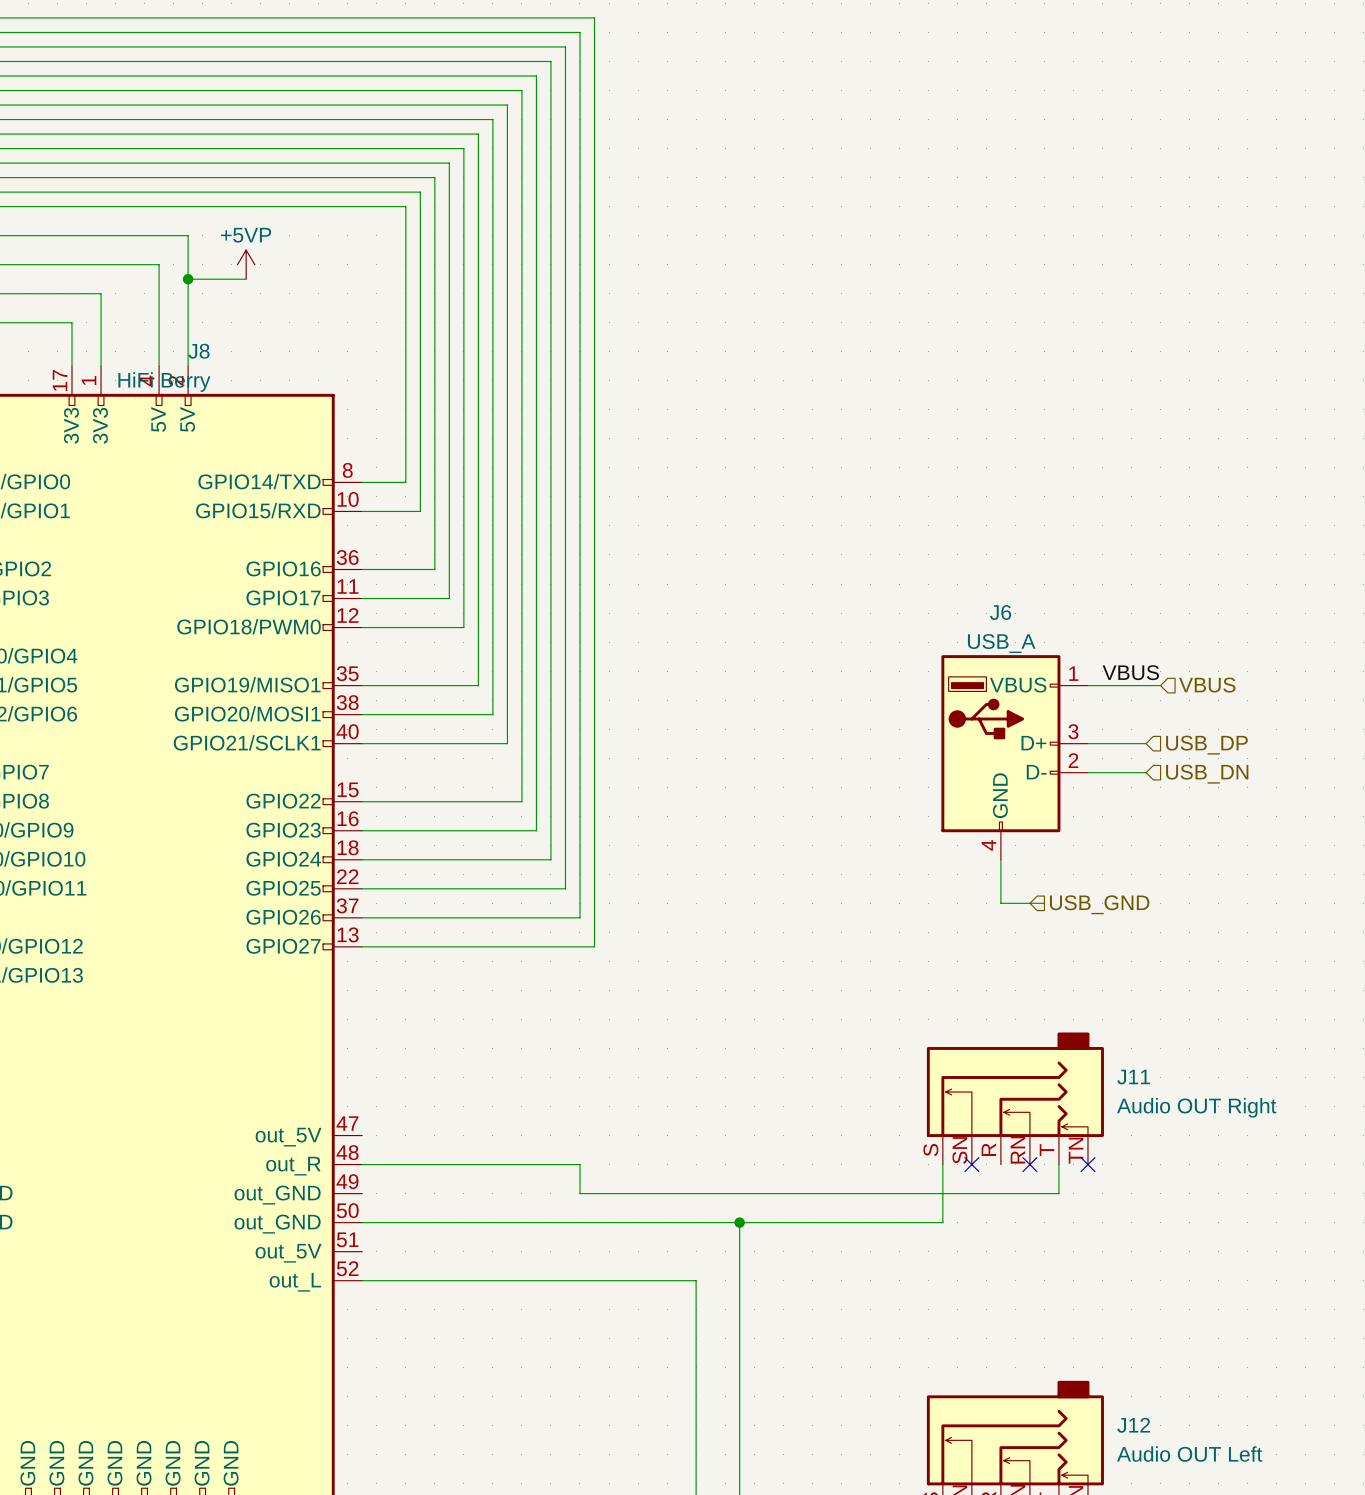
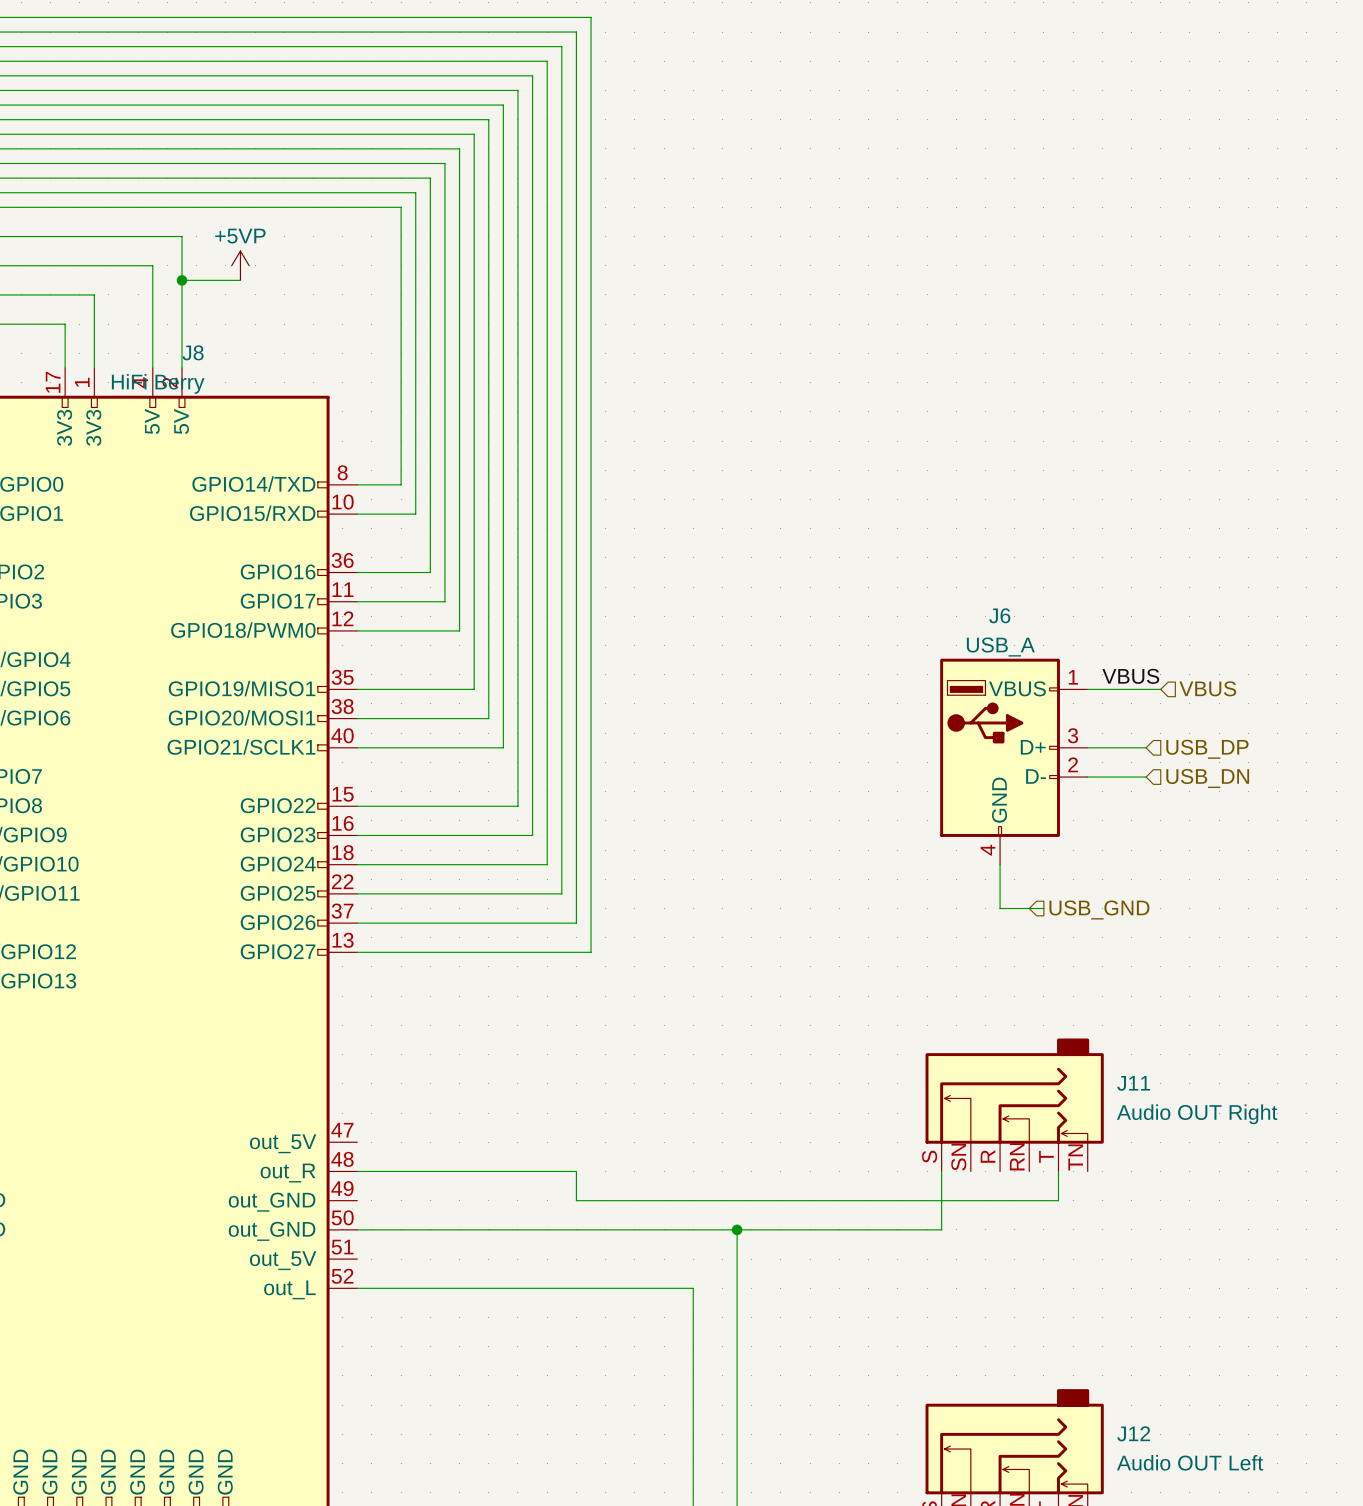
no-connect mark: (971, 1164) -> none
no-connect mark: (1029, 1164) -> none
no-connect mark: (1087, 1164) -> none

